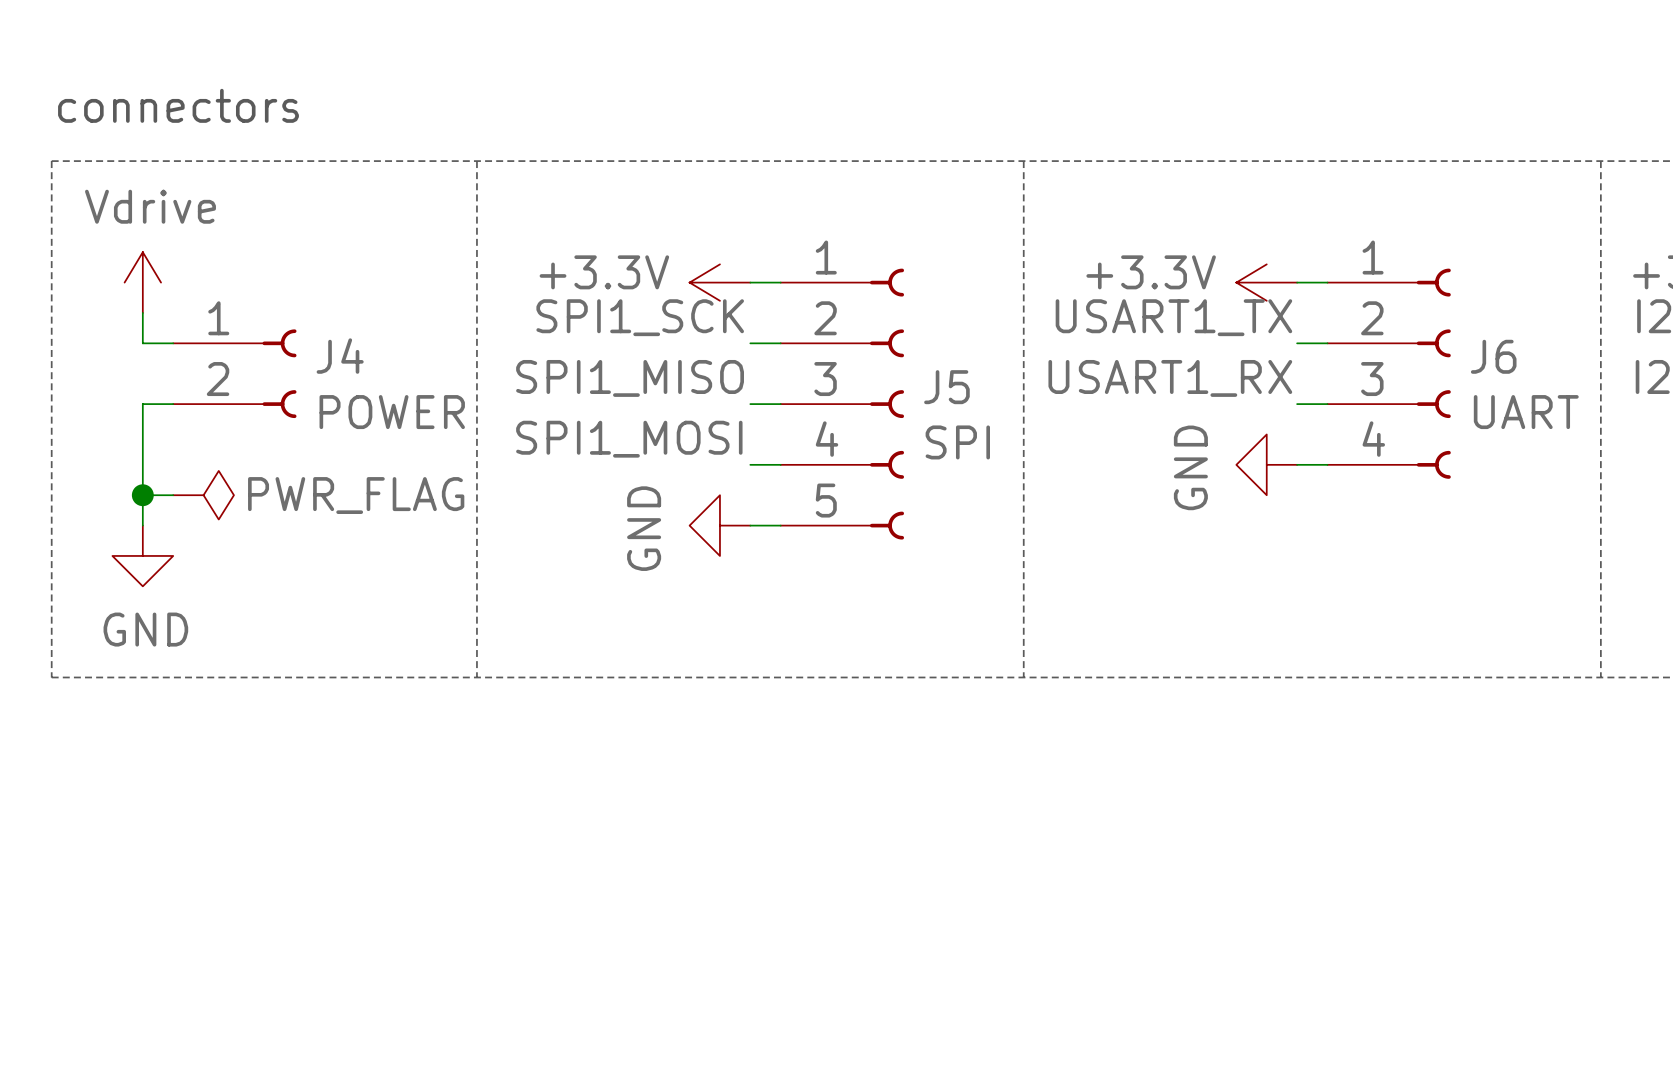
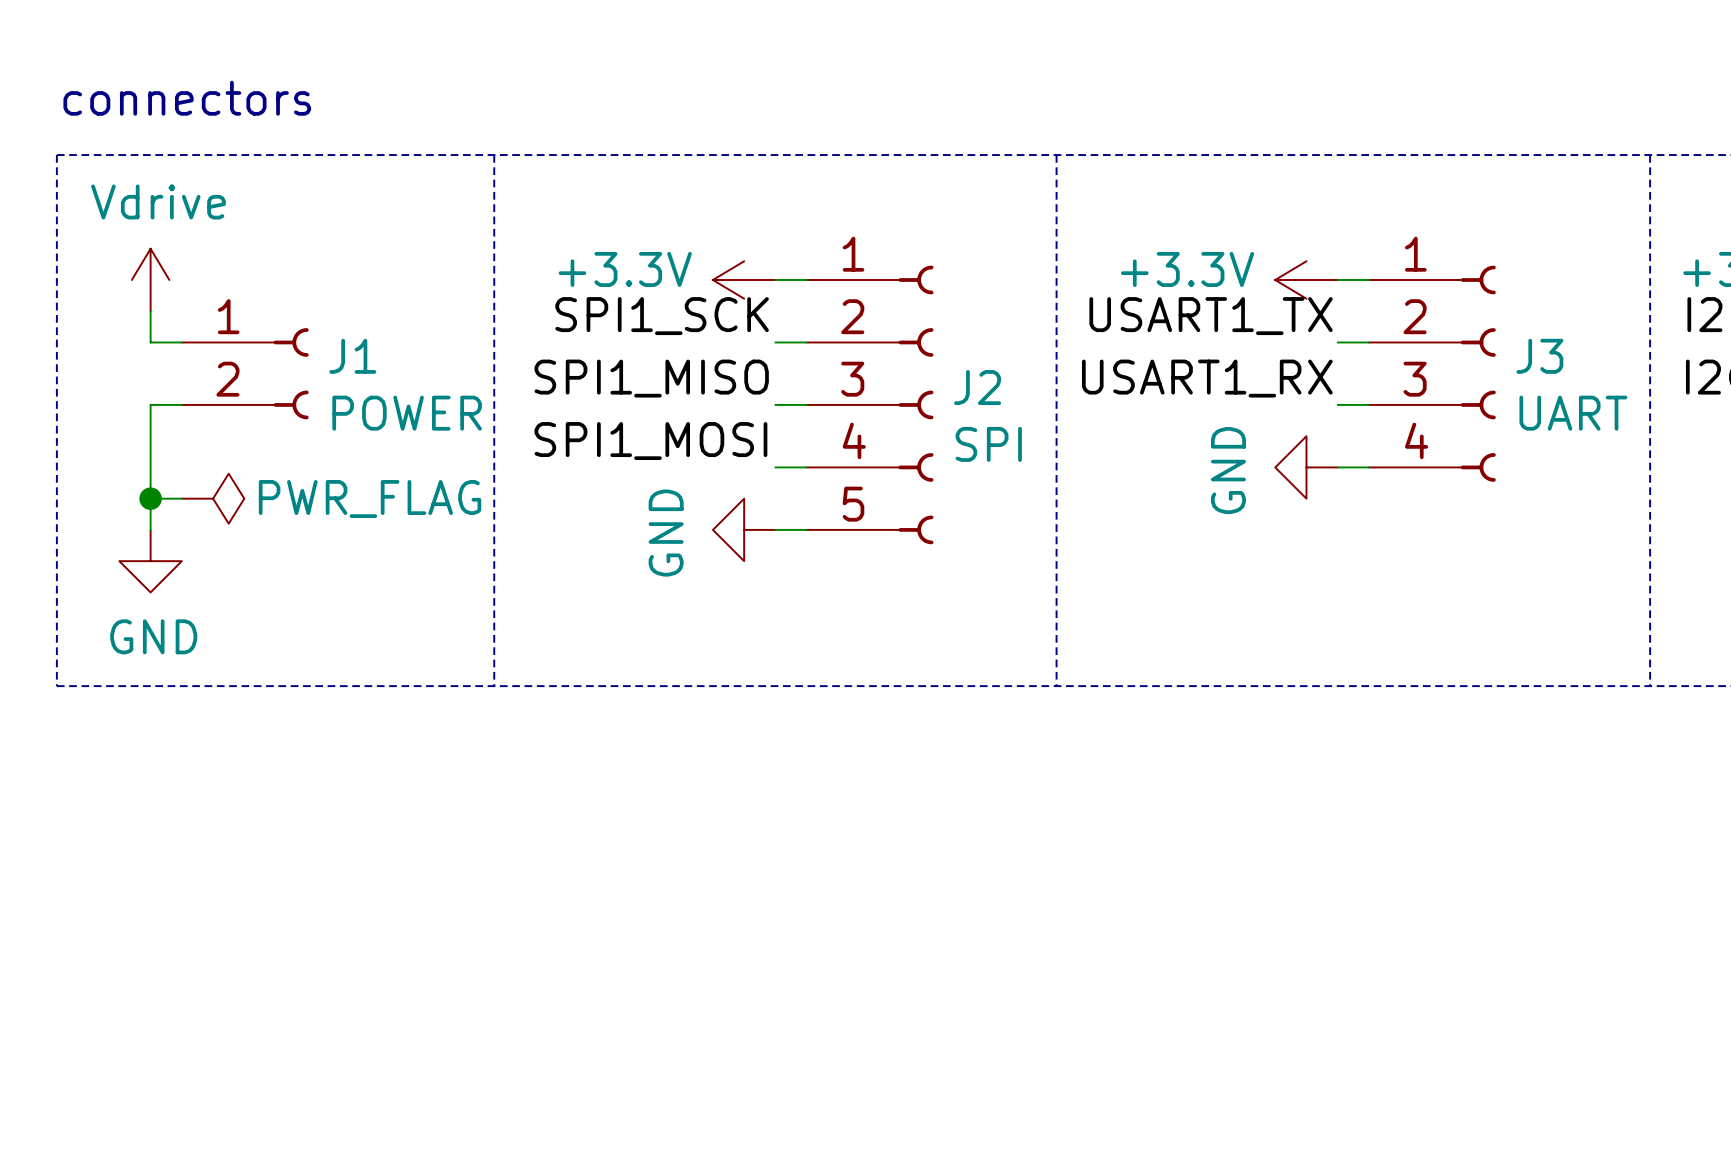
J4 name: J4 (340, 356) -> J1 (352, 356)
J6 name: J6 (1493, 356) -> J3 (1539, 356)
J5 name: J5 (946, 387) -> J2 (977, 387)

